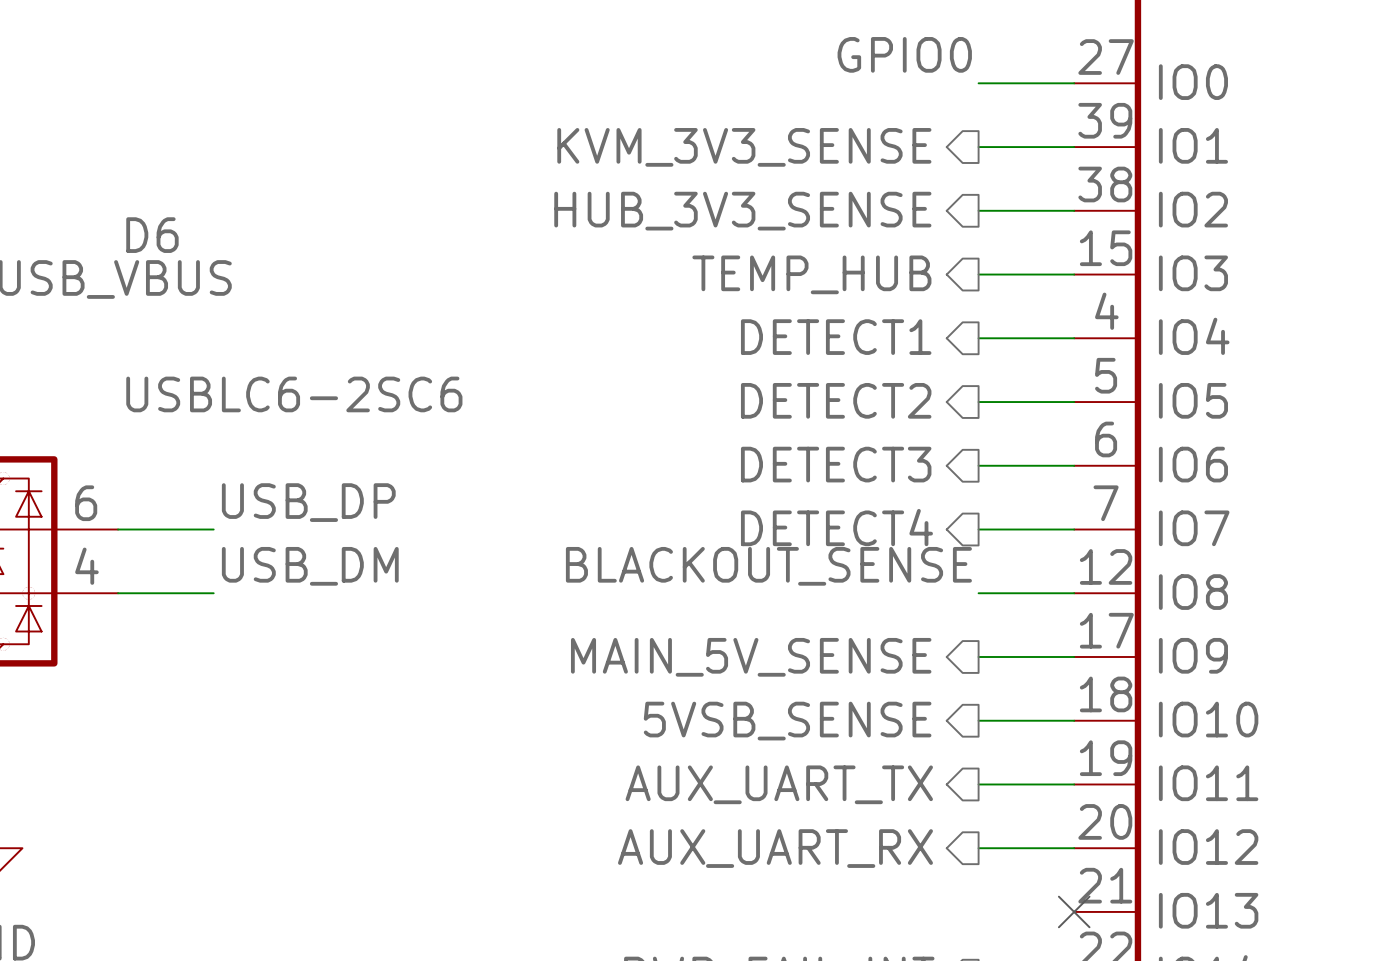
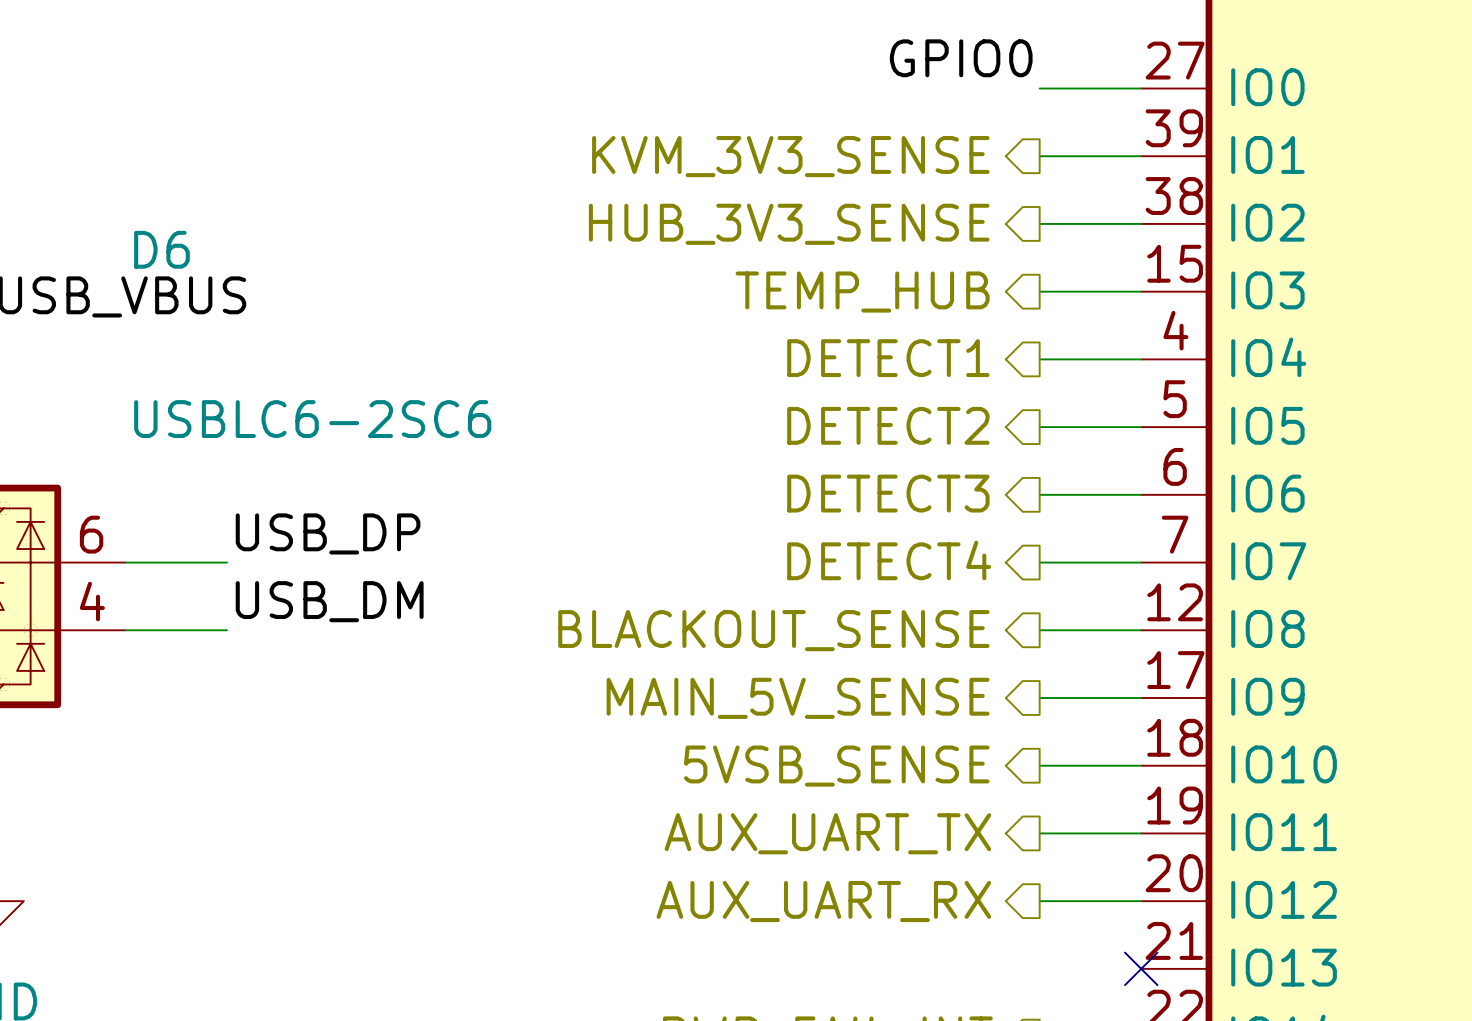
label: BLACKOUT_SENSE (768, 566) -> none
hierarchical label: none -> BLACKOUT_SENSE (773, 630)

